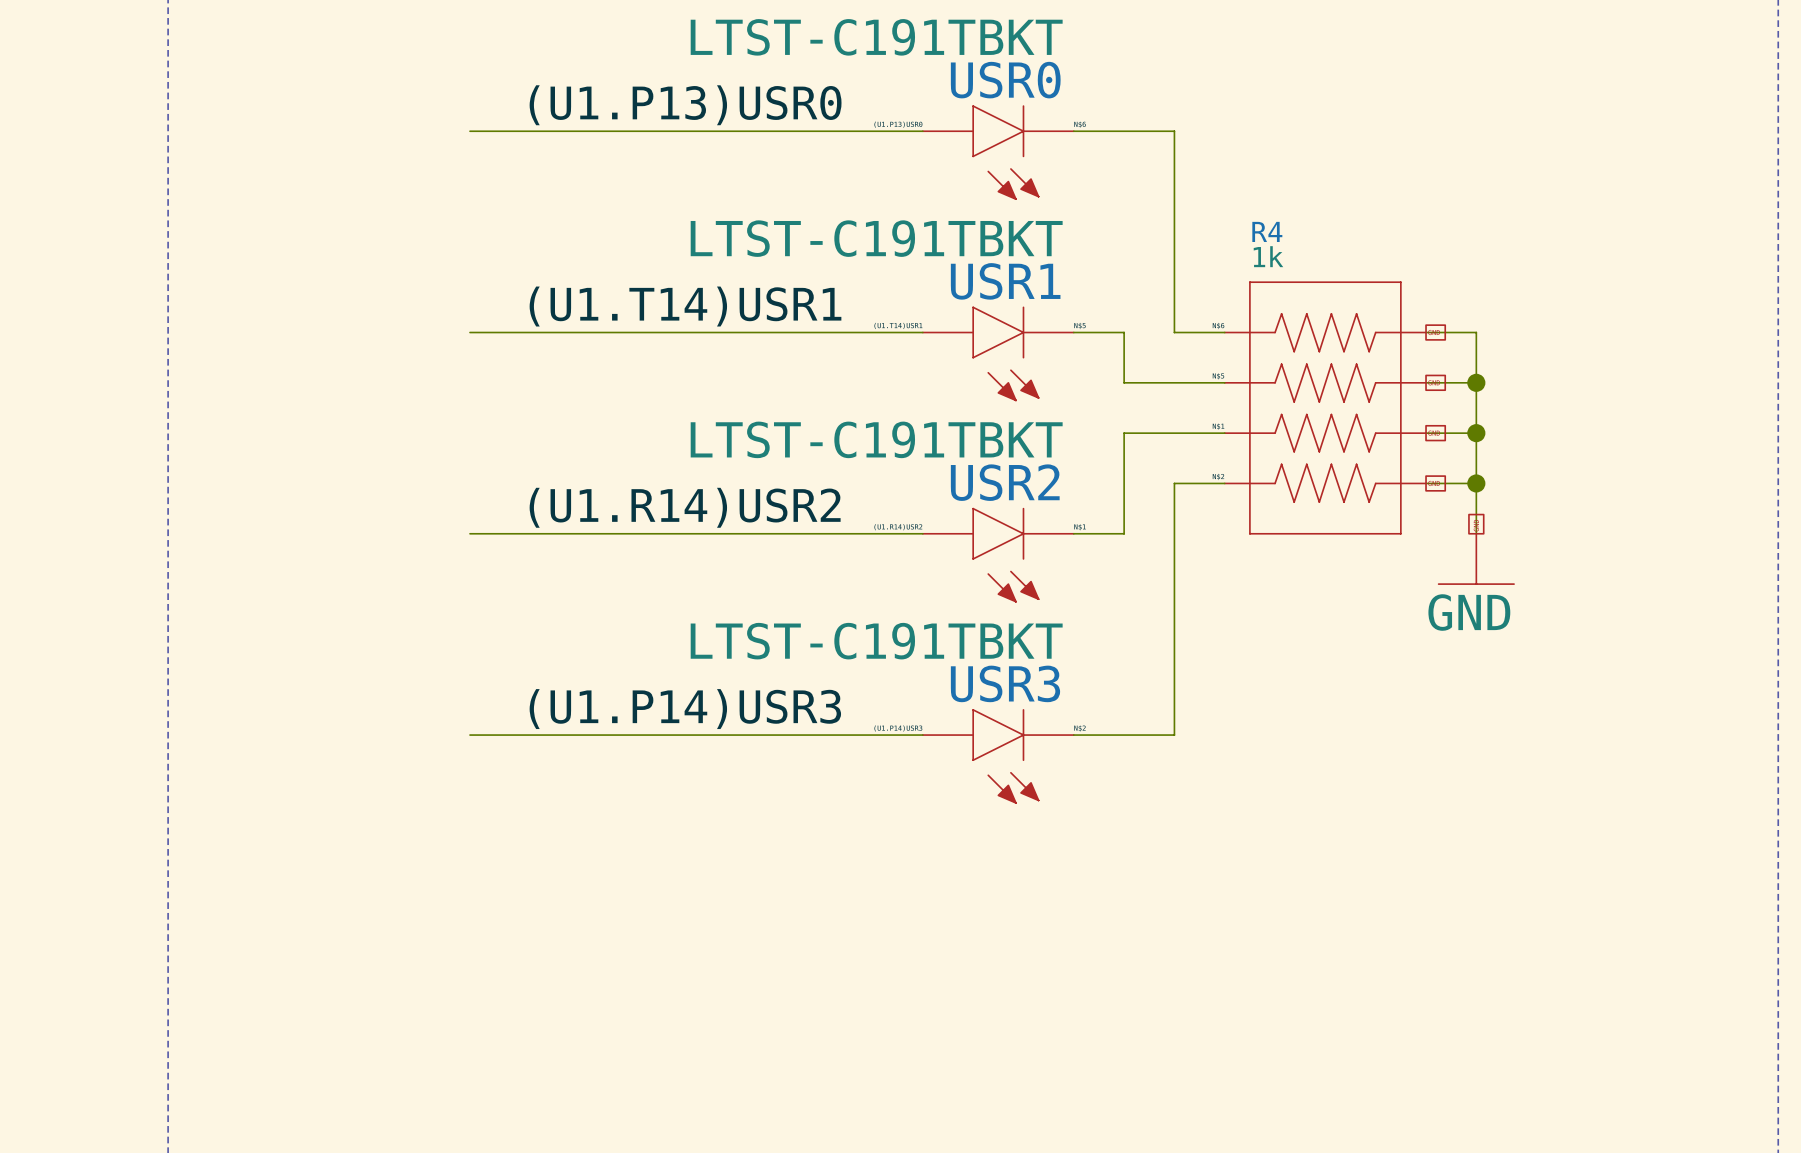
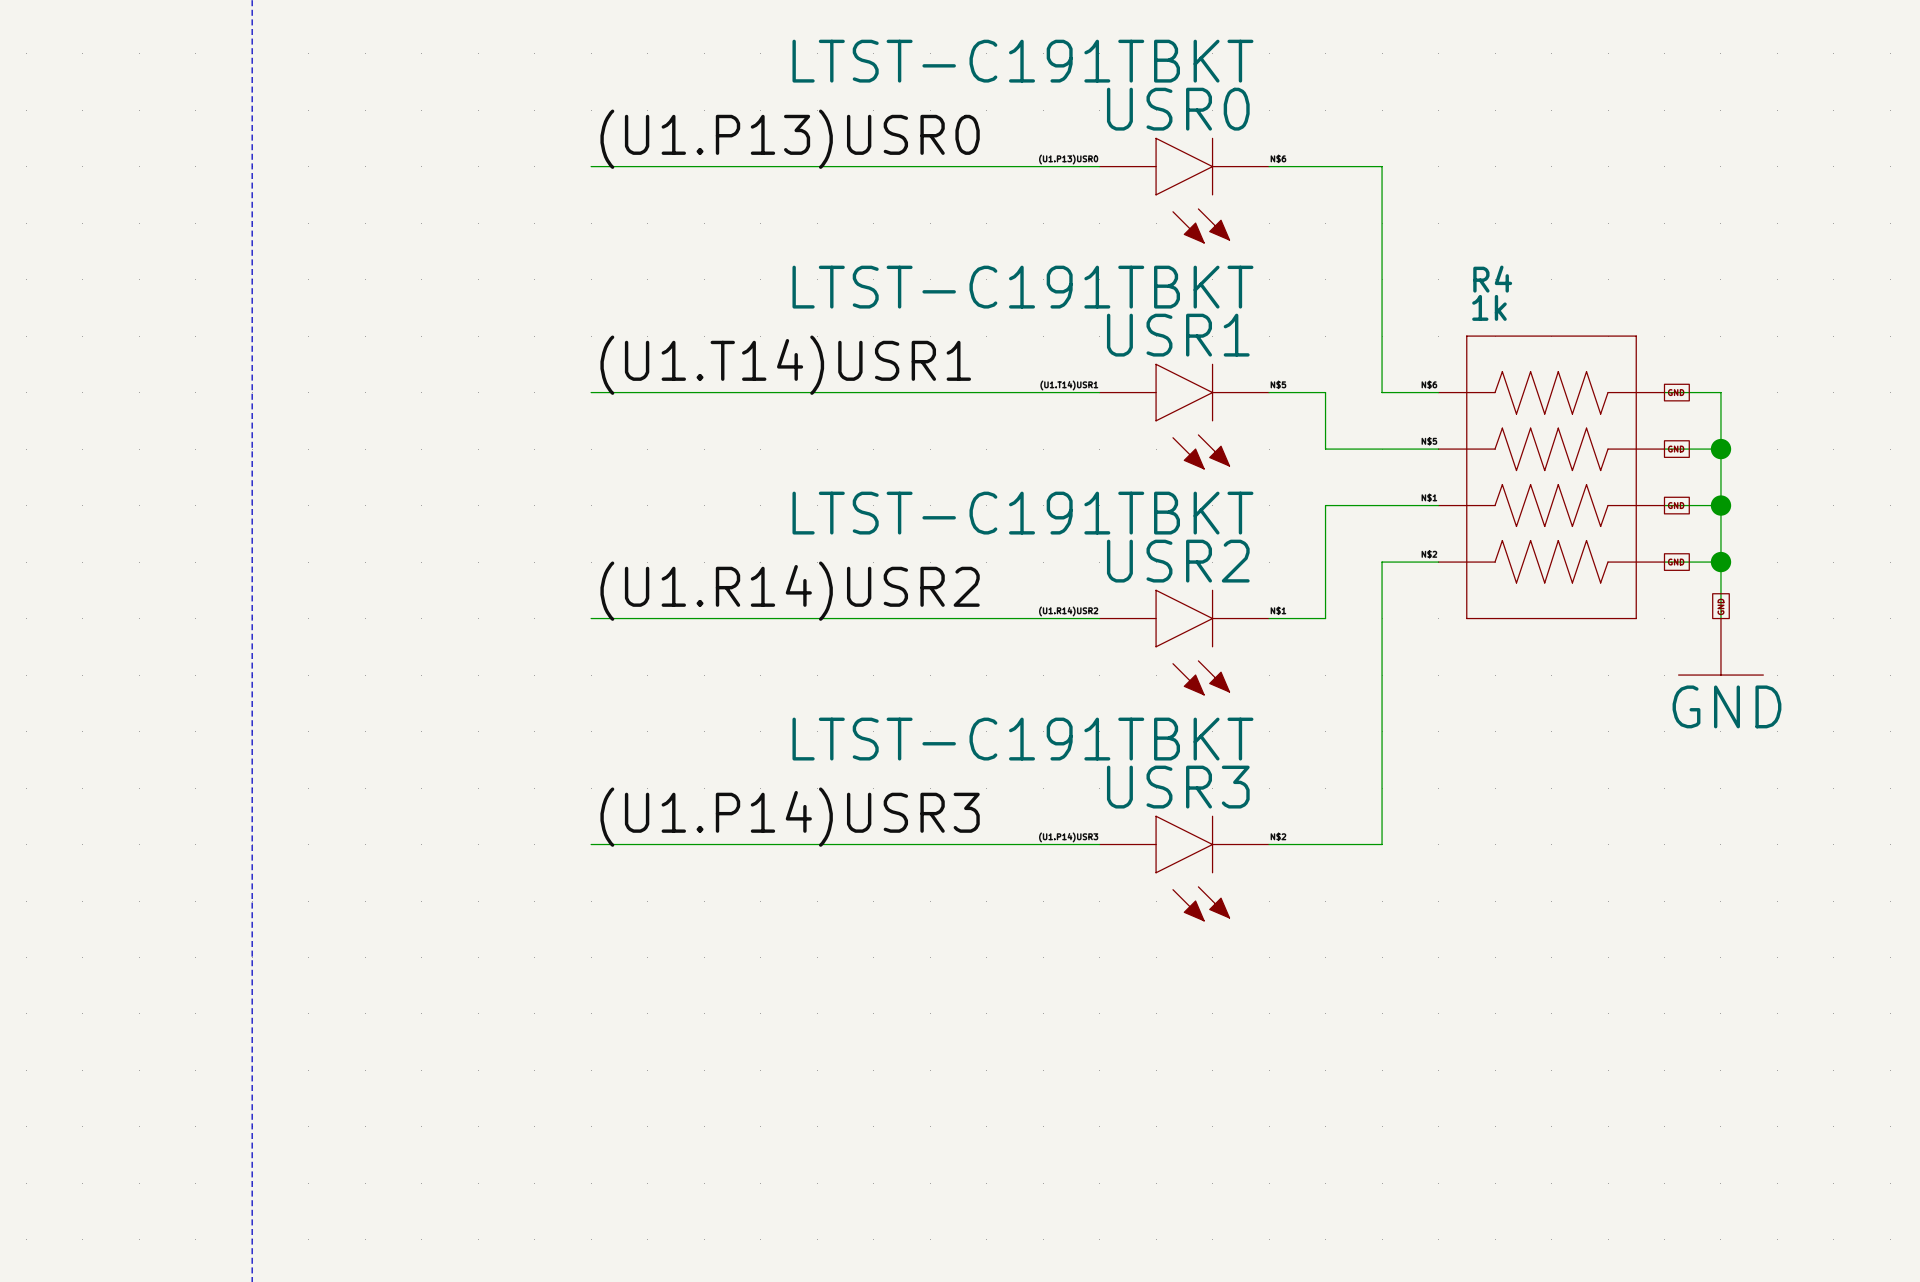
label position: (U1.P13)USR0 (685, 105) -> (U1.P13)USR0 (790, 139)
label position: (U1.T14)USR1 (685, 306) -> (U1.T14)USR1 (785, 365)
label position: (U1.R14)USR2 (685, 507) -> (U1.R14)USR2 (790, 591)
label position: (U1.P14)USR3 (685, 709) -> (U1.P14)USR3 (790, 817)

